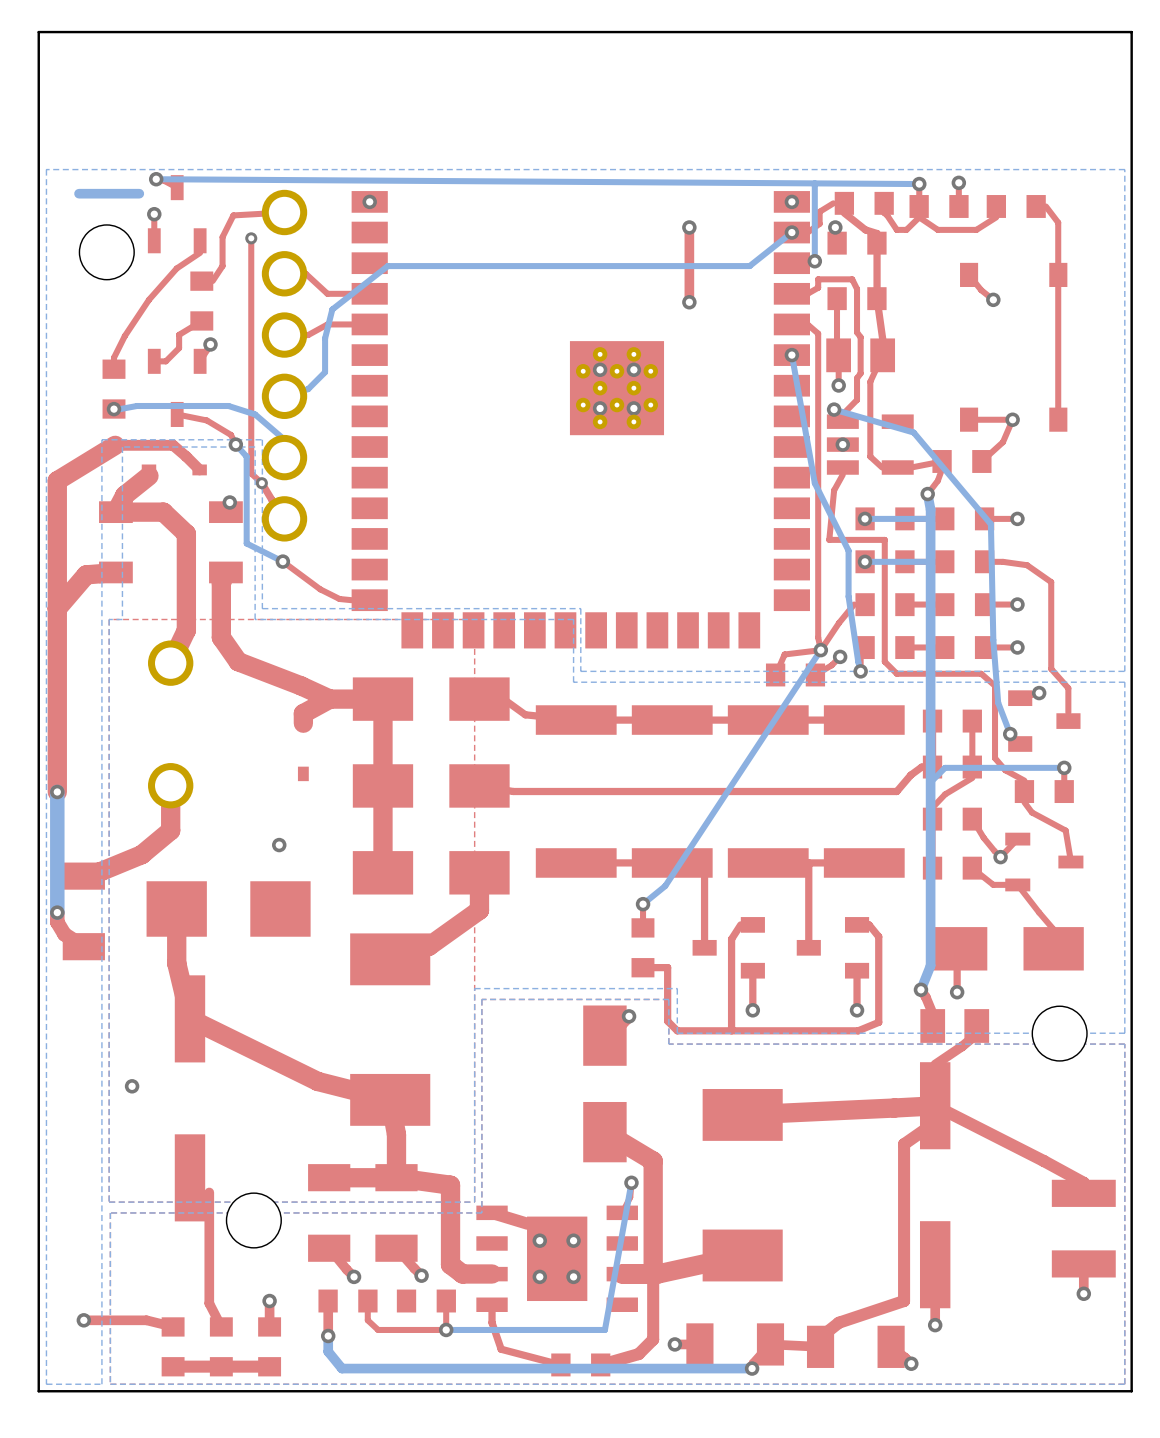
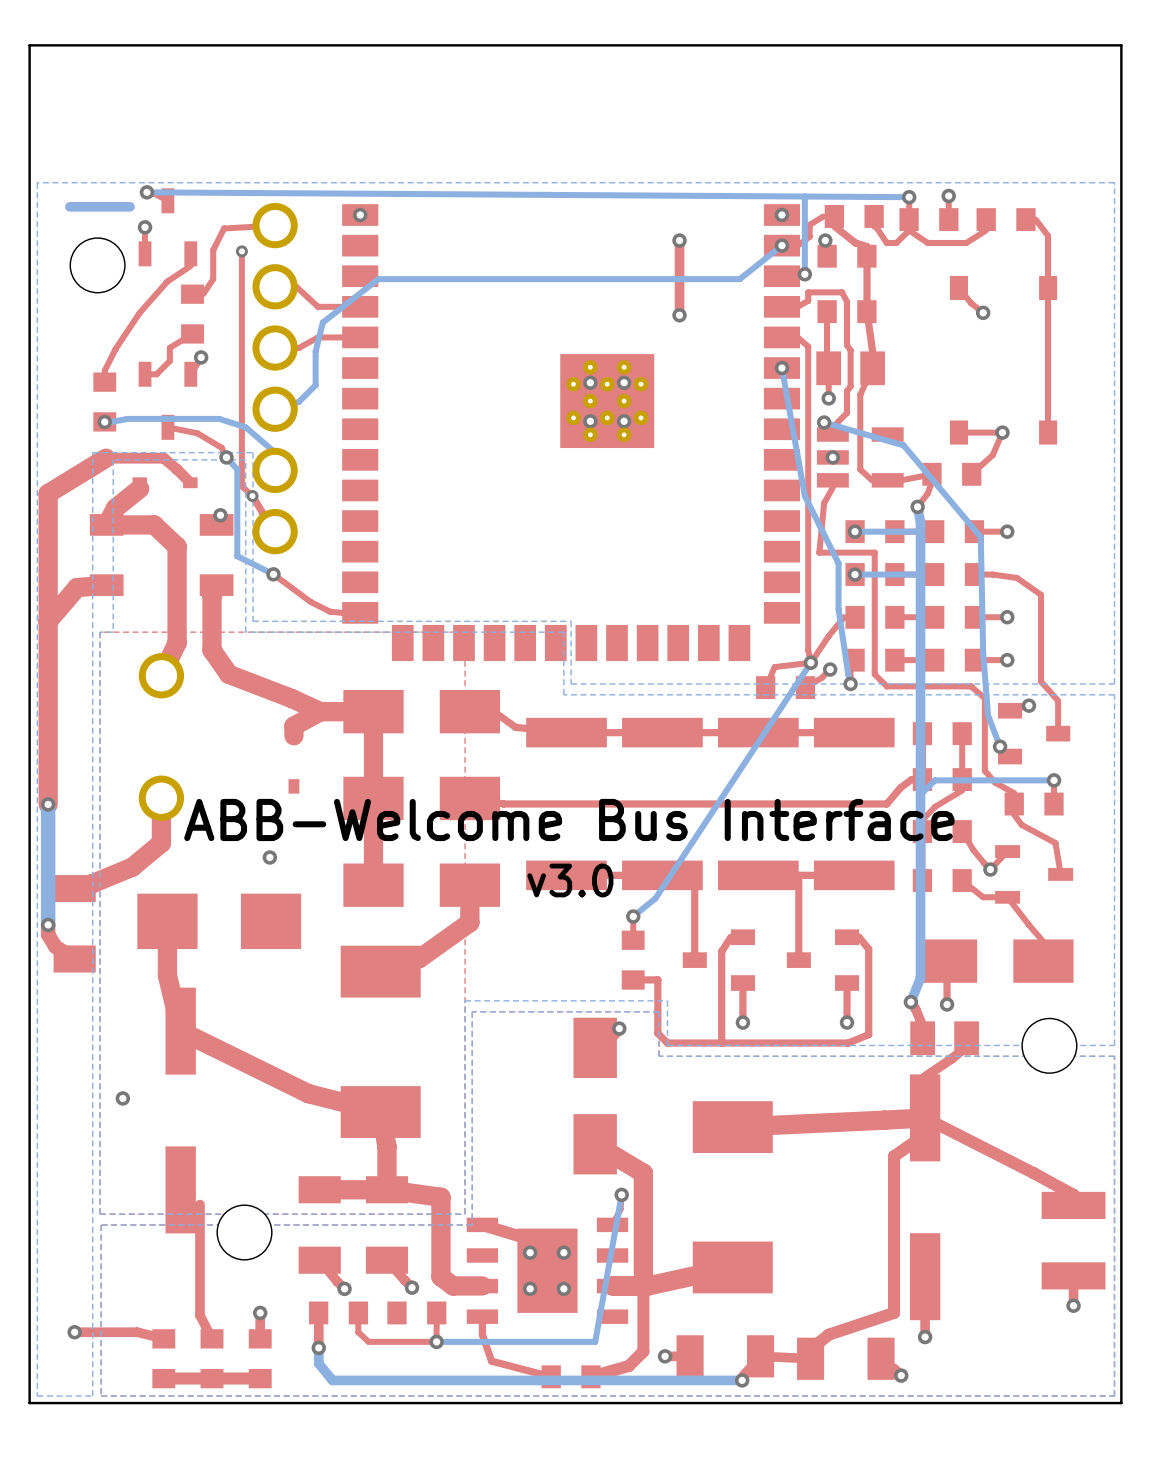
text: none -> ABB-Welcome Bus Interface (569, 819)
text: none -> v3.0 (570, 880)

